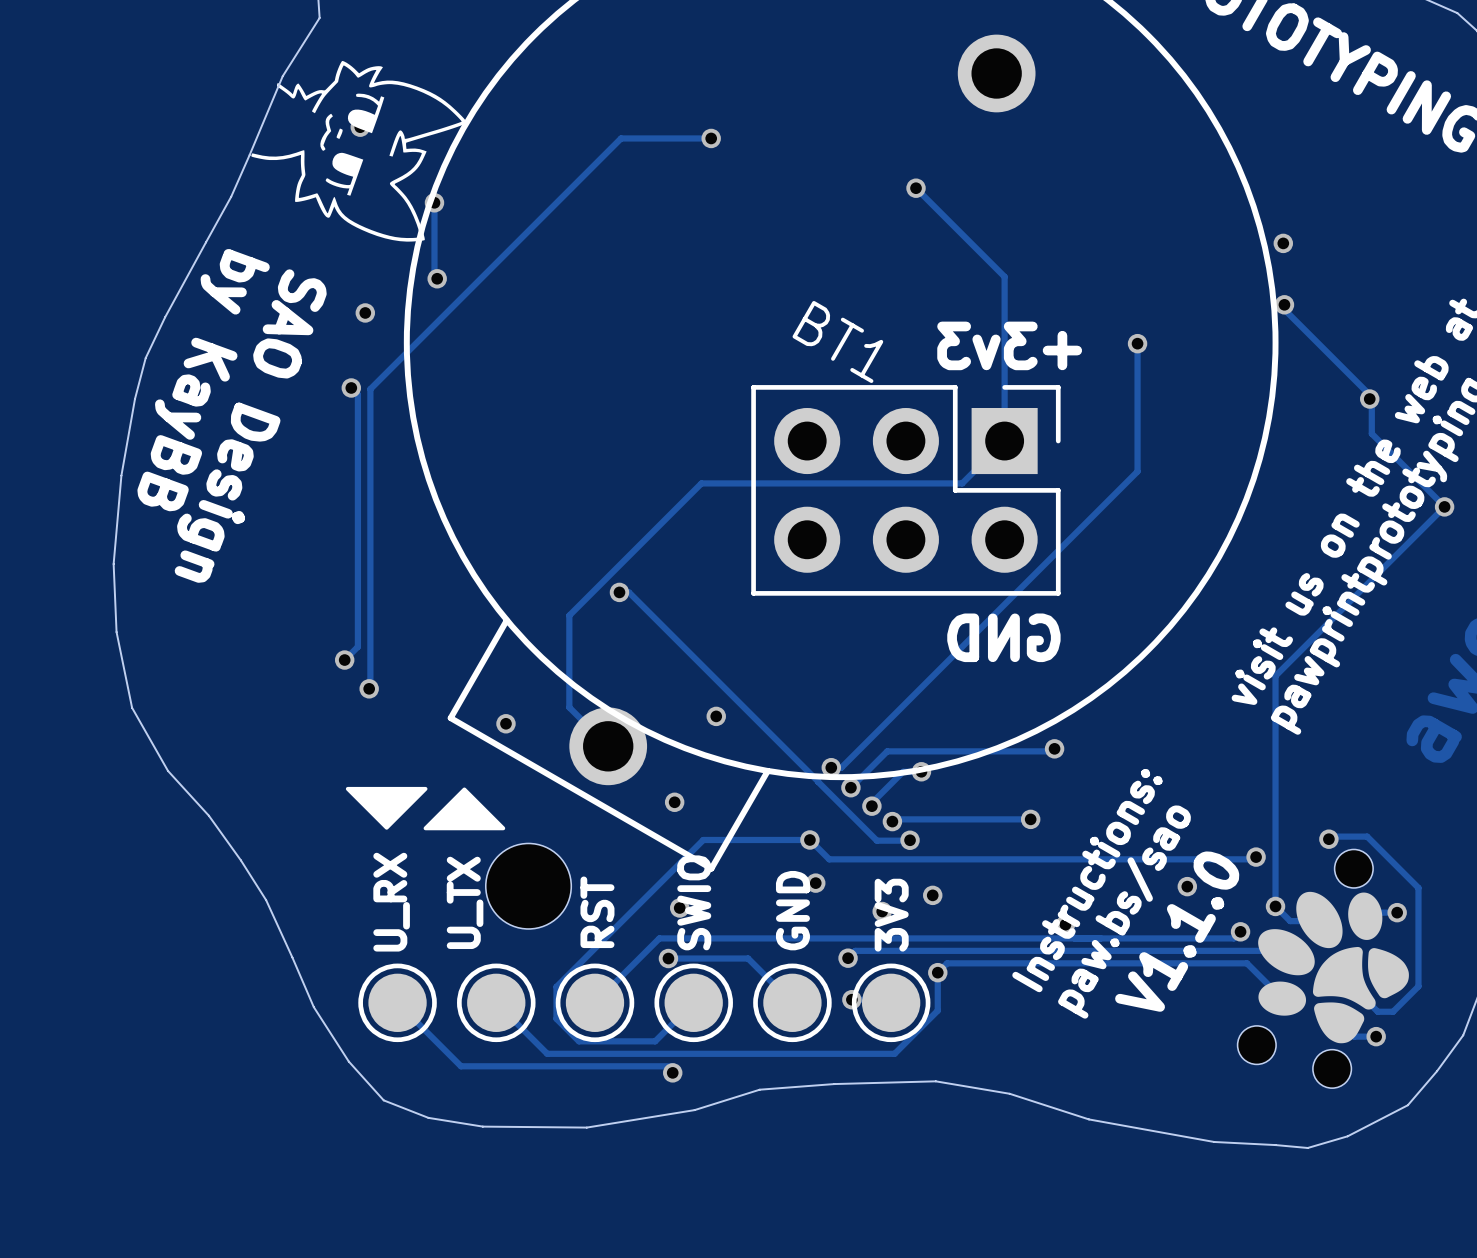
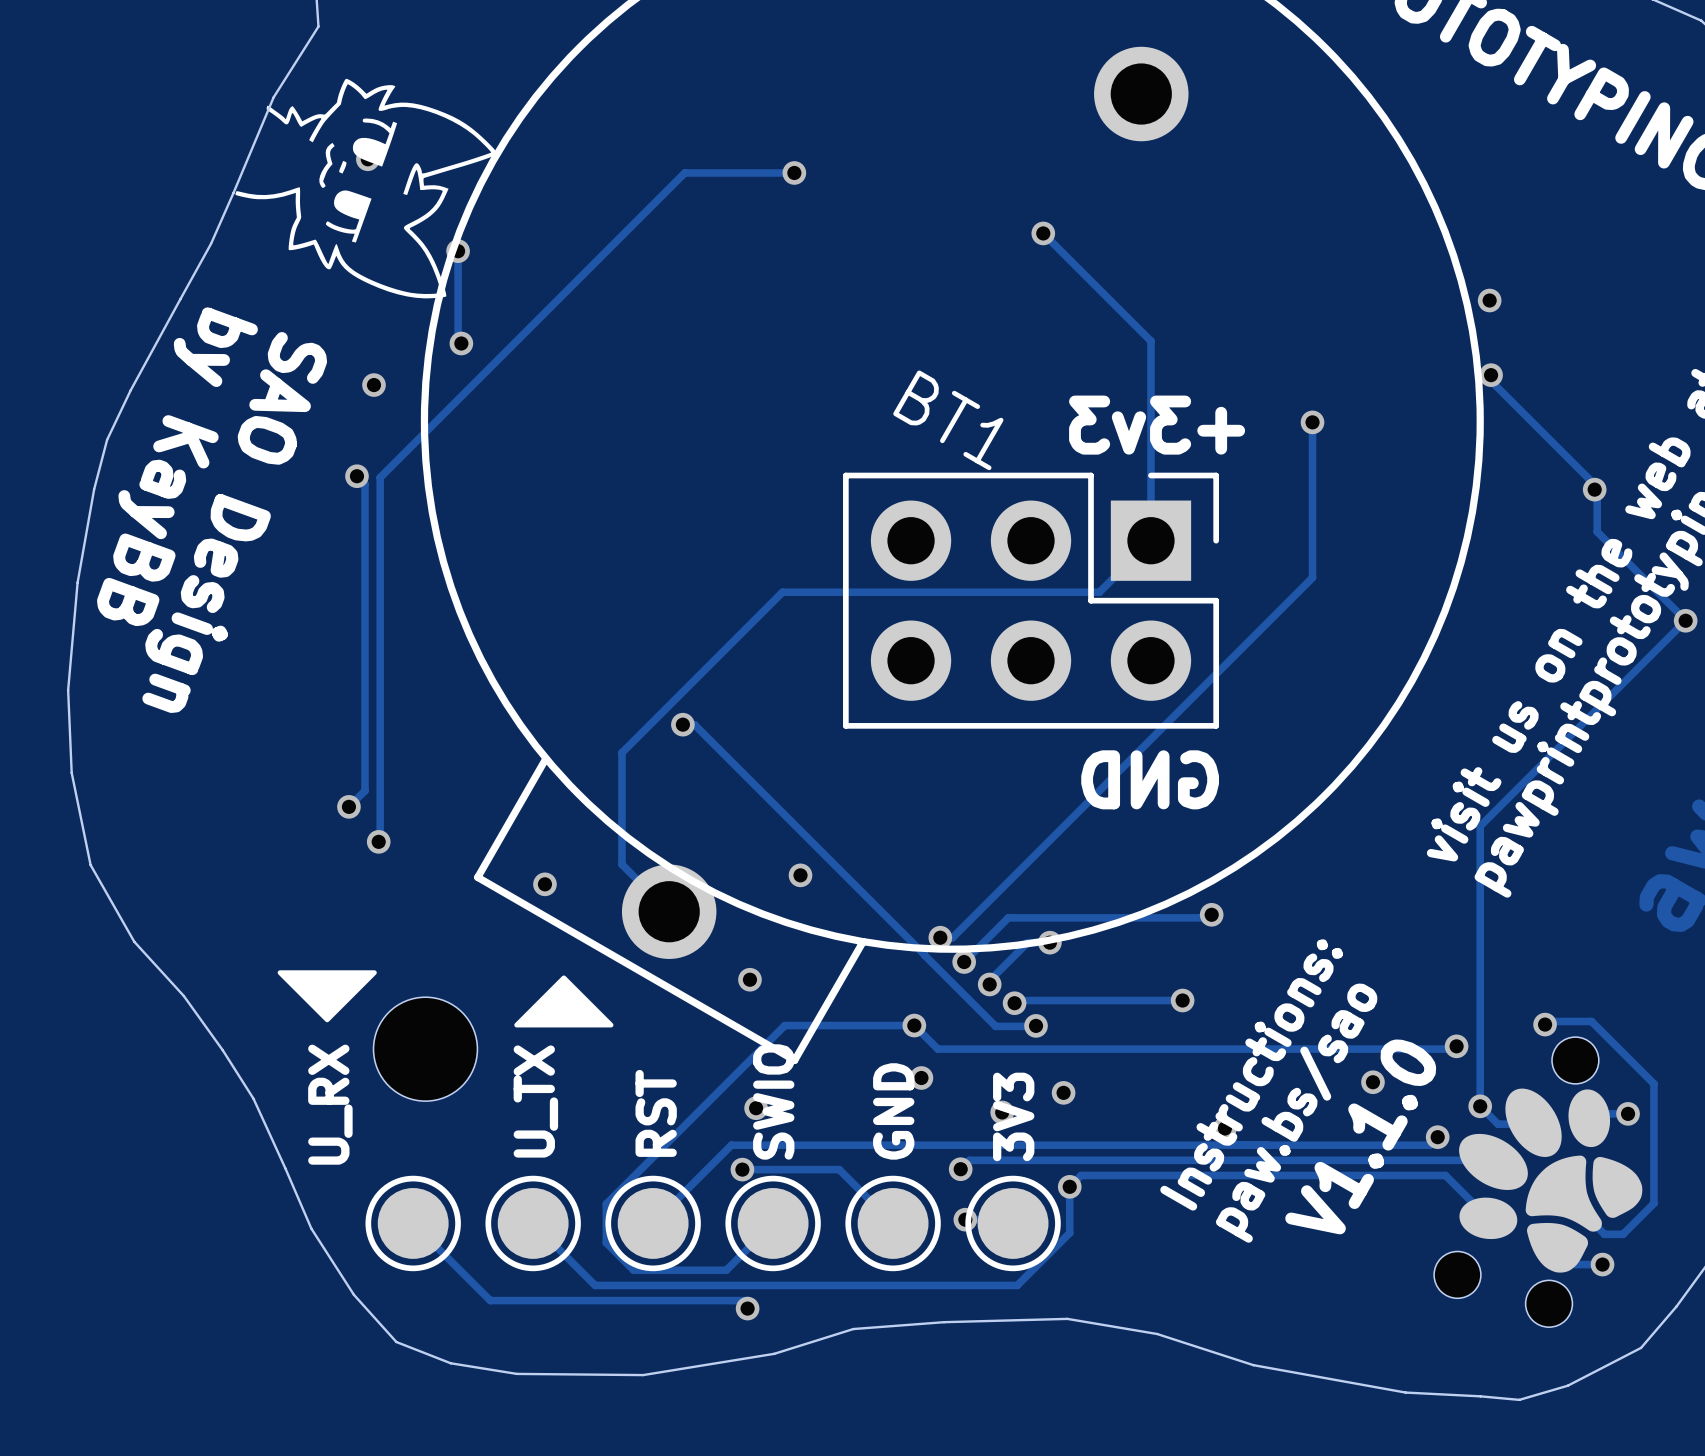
drawing position: (386, 808) -> (327, 996)
drawing position: (464, 808) -> (563, 1001)
part position: (528, 886) -> (425, 1049)
text position: U_RX (391, 902) -> U_RX (330, 1104)
text position: U_TX (465, 902) -> U_TX (535, 1101)

